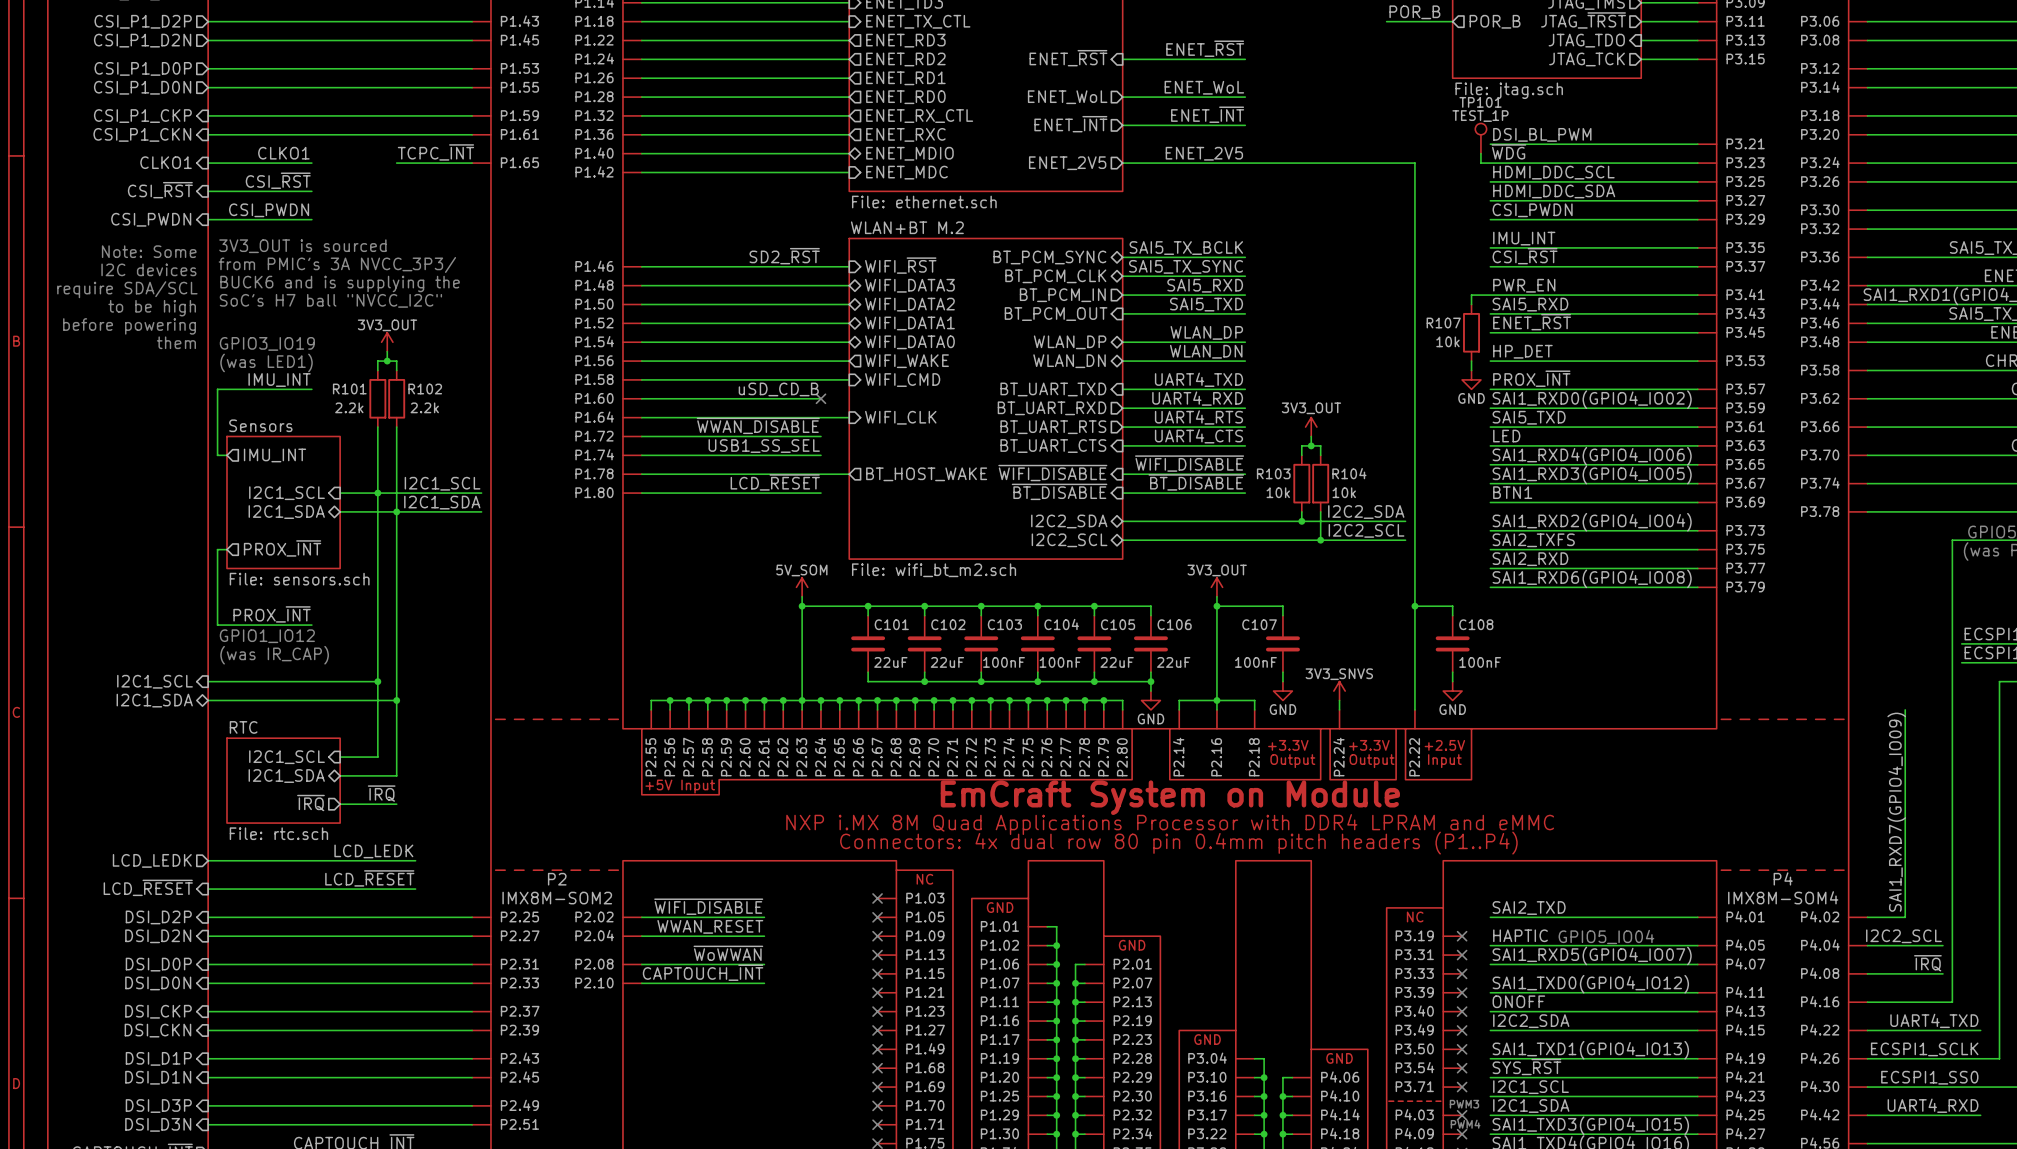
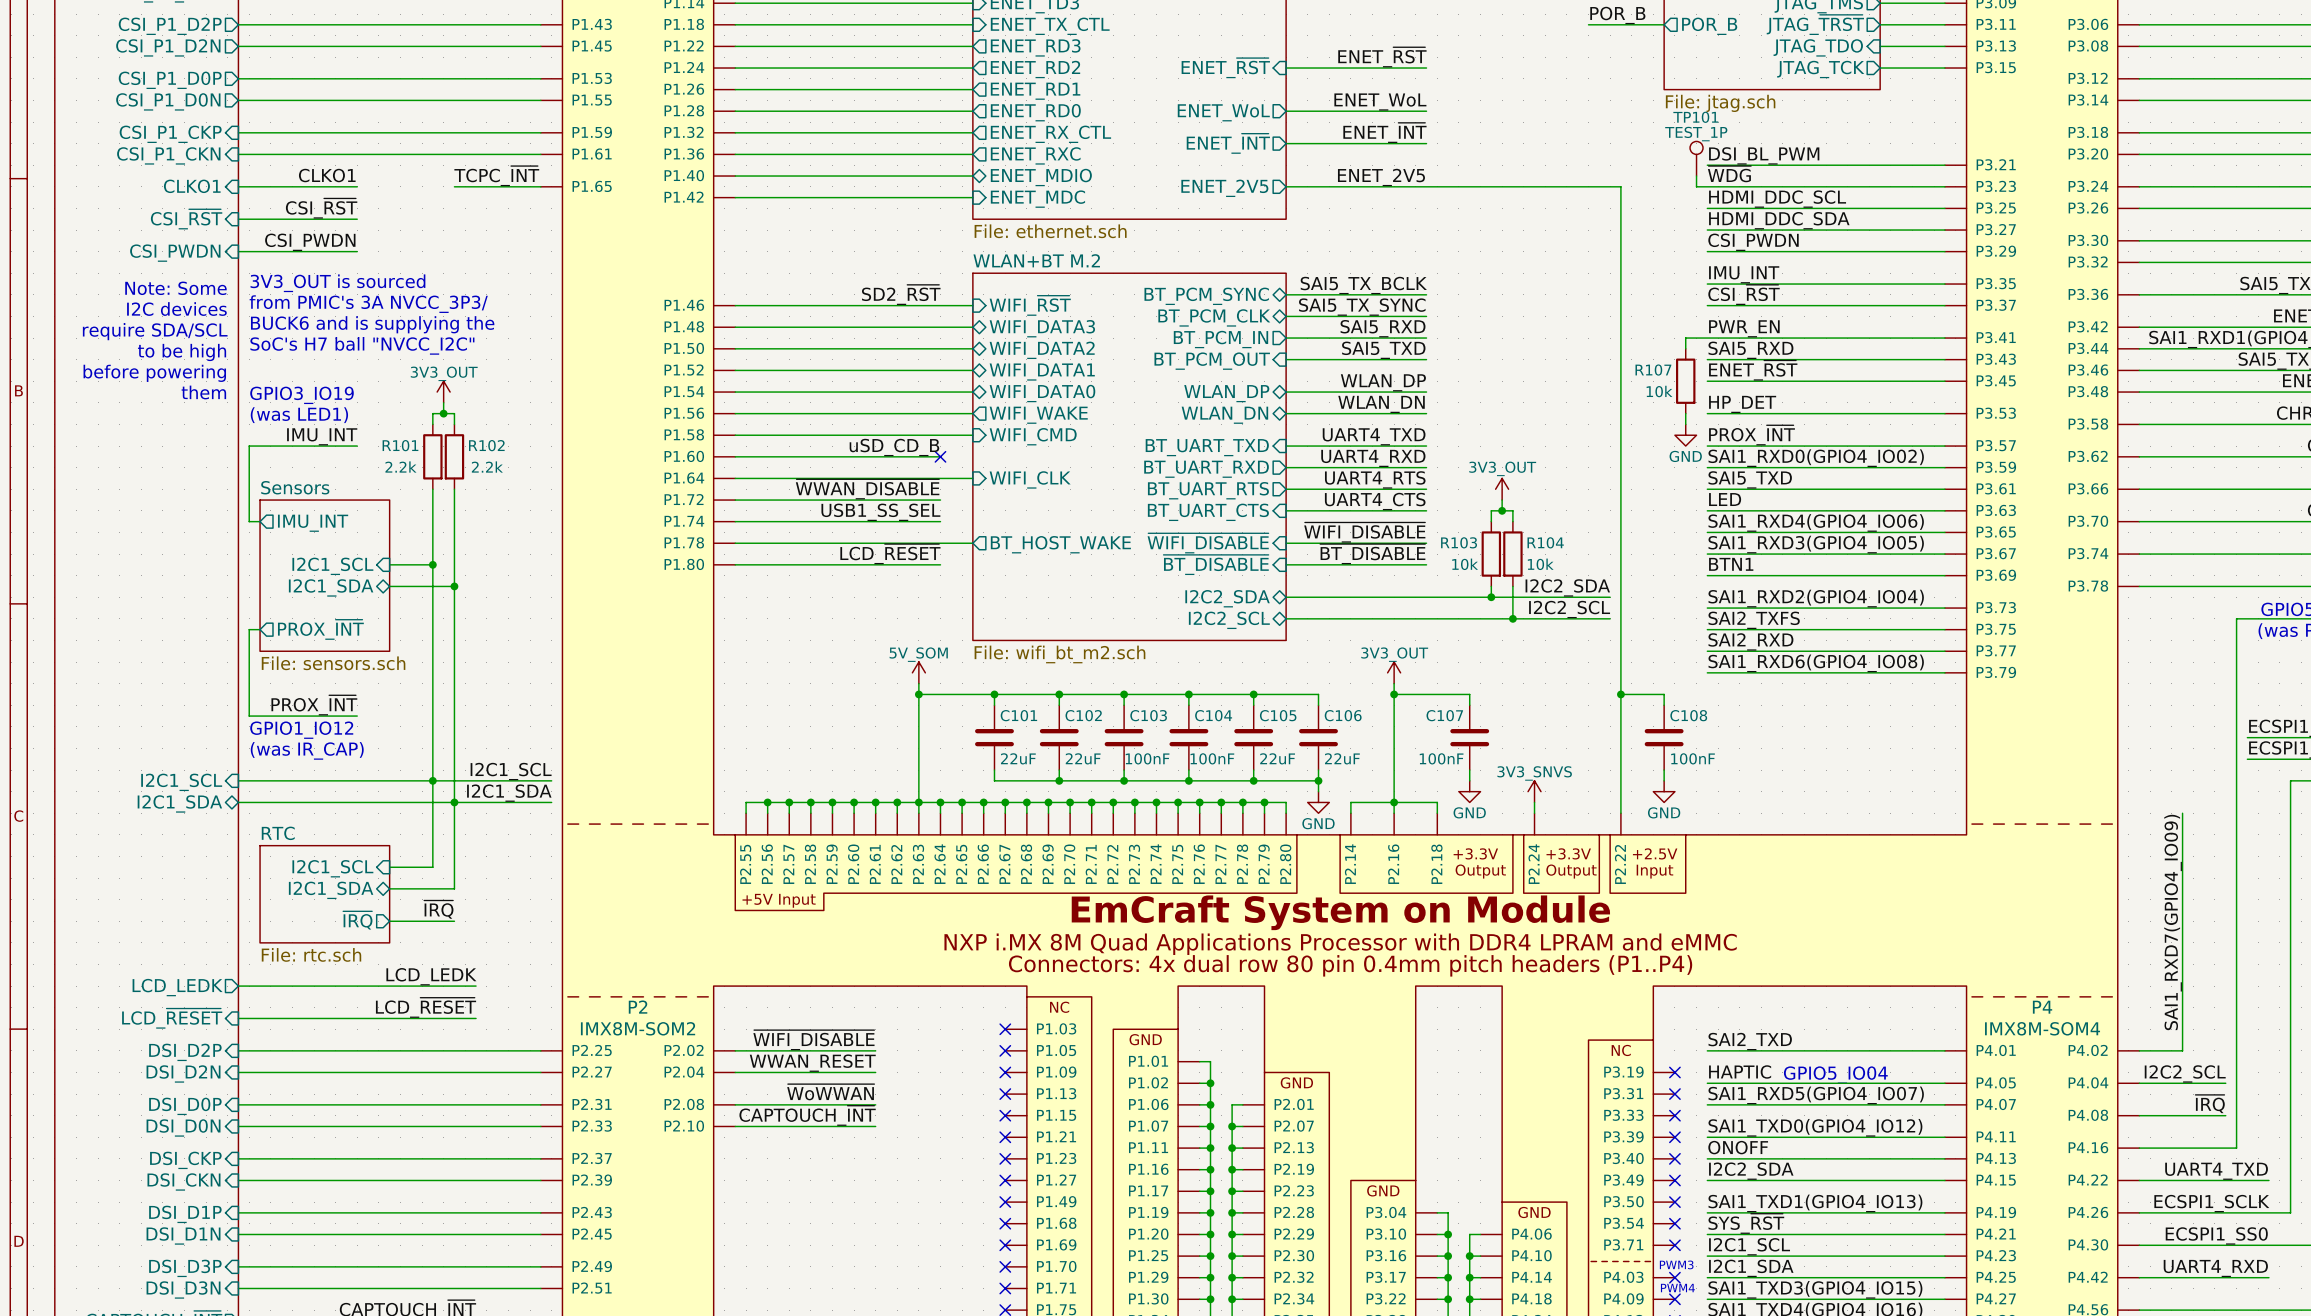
label: I2C1_SCL (442, 483) -> none
wire: (377, 493) (481, 493) -> none
label: I2C1_SDA (442, 502) -> none
wire: (396, 511) (481, 511) -> none
label: none -> I2C1_SCL (511, 771)
wire: none -> (432, 780) (551, 780)
label: none -> I2C1_SDA (509, 793)
wire: none -> (454, 802) (551, 802)

